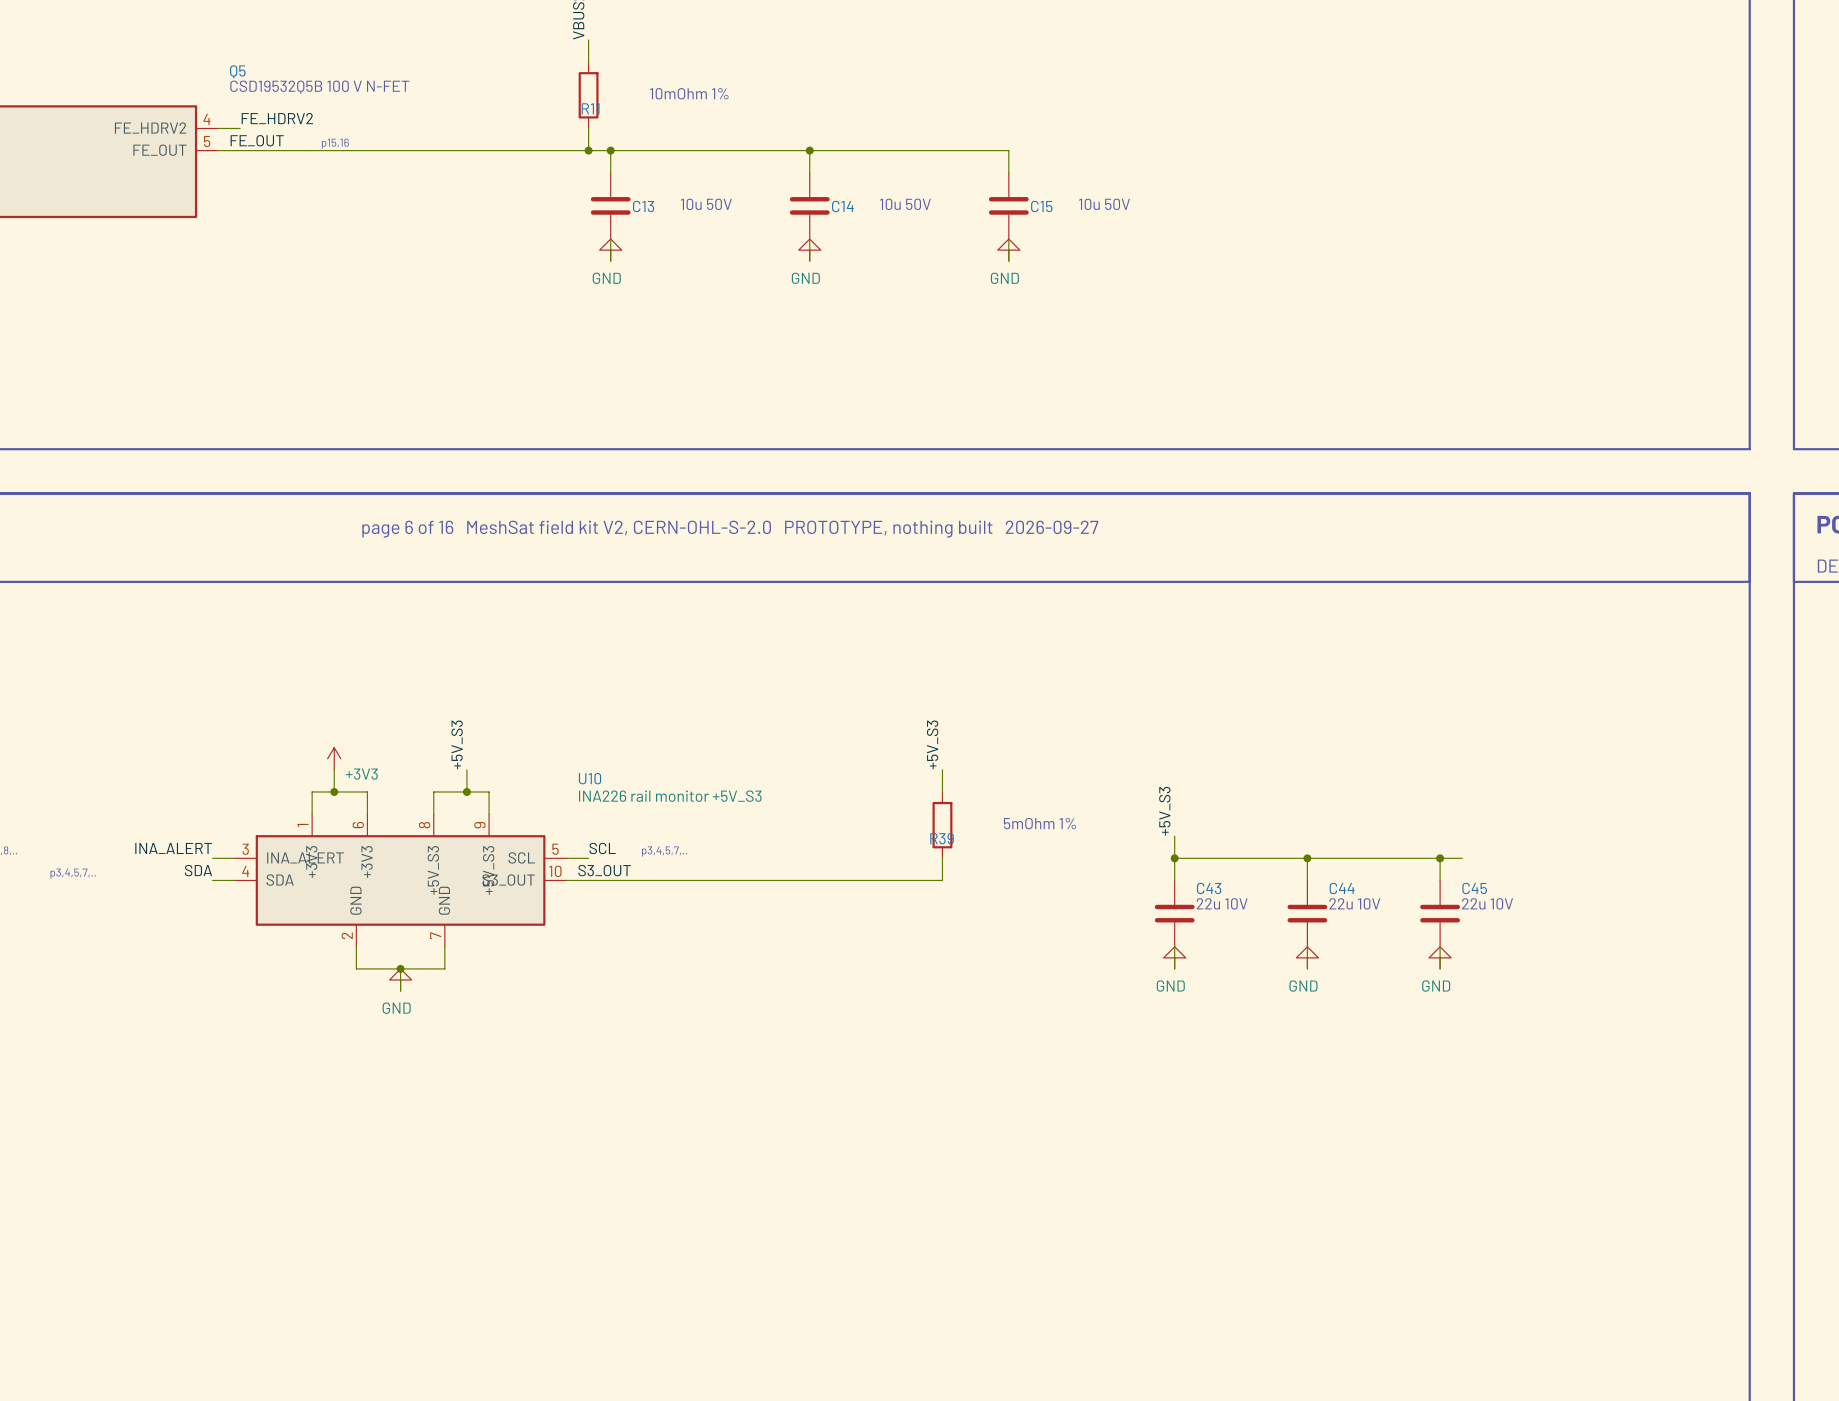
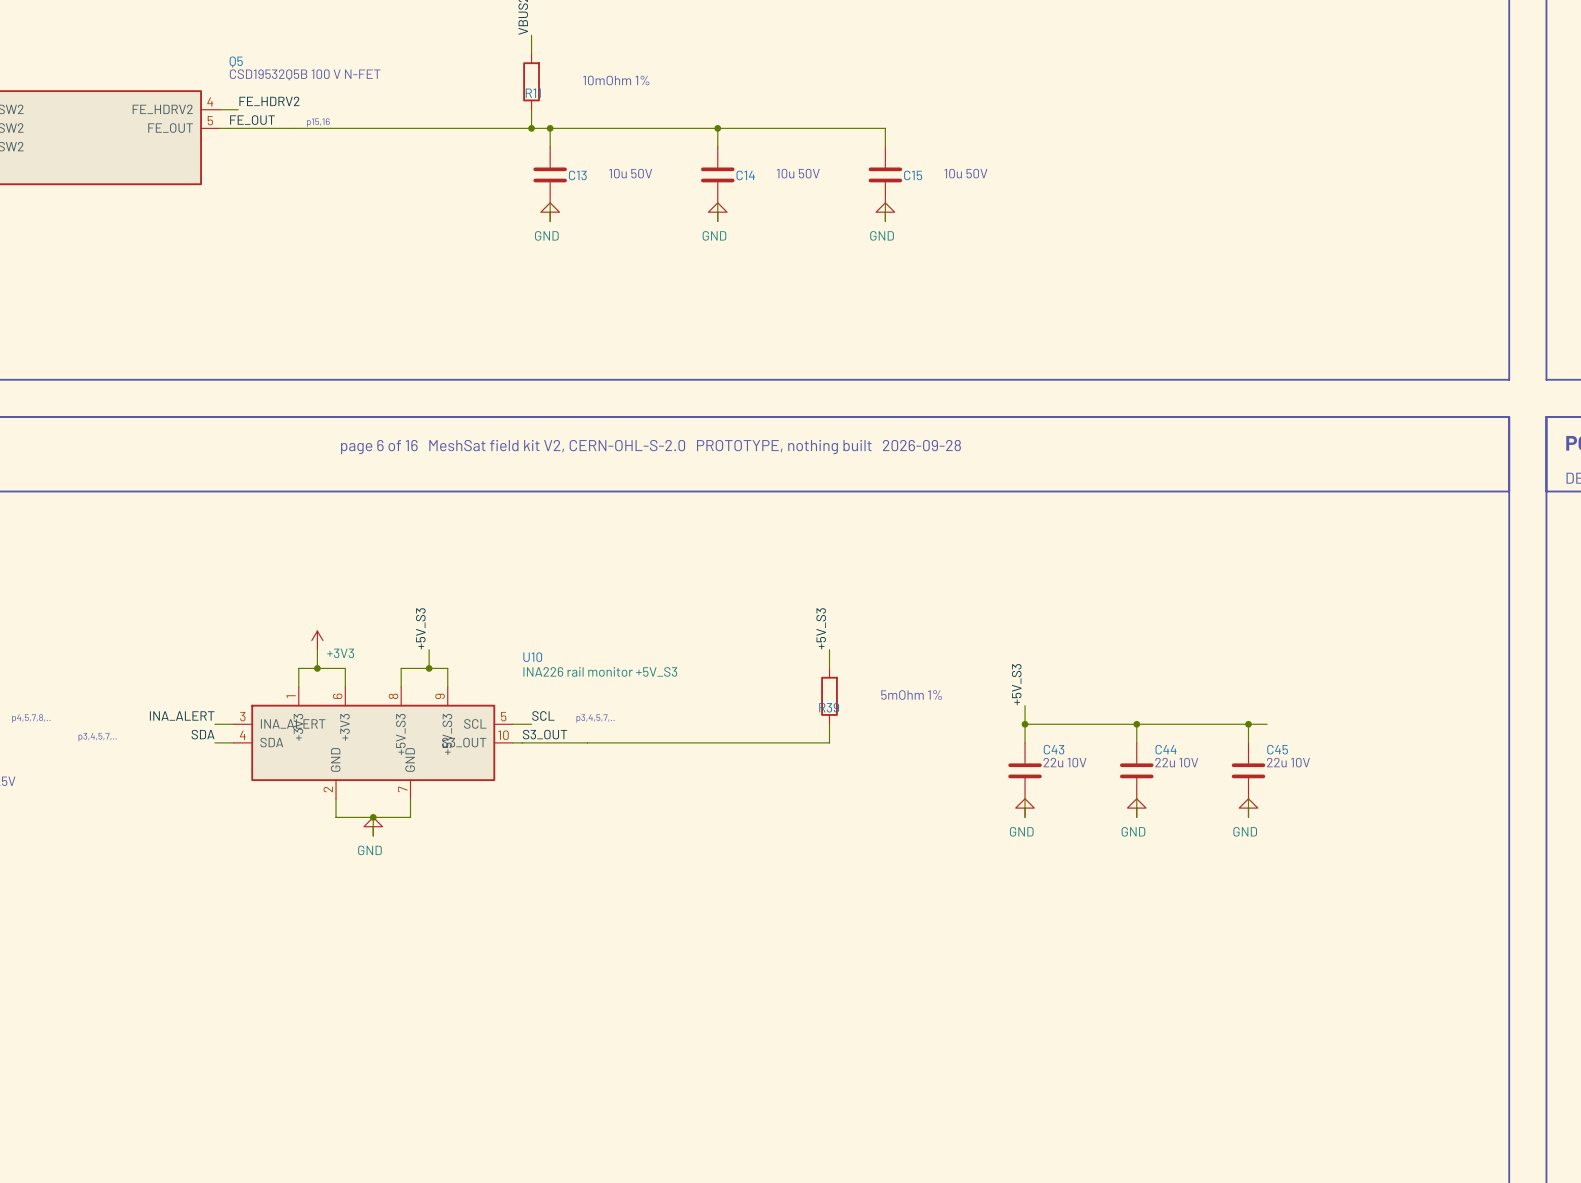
text: page 6 of 16 MeshSat field kit V2, CERN-OHL-S-2.0 PROTOTYPE, nothing built 2026-09-27 (730, 529) -> page 6 of 16 MeshSat field kit V2, CERN-OHL-S-2.0 PROTOTYPE, nothing built 2026-09-28 (650, 447)

